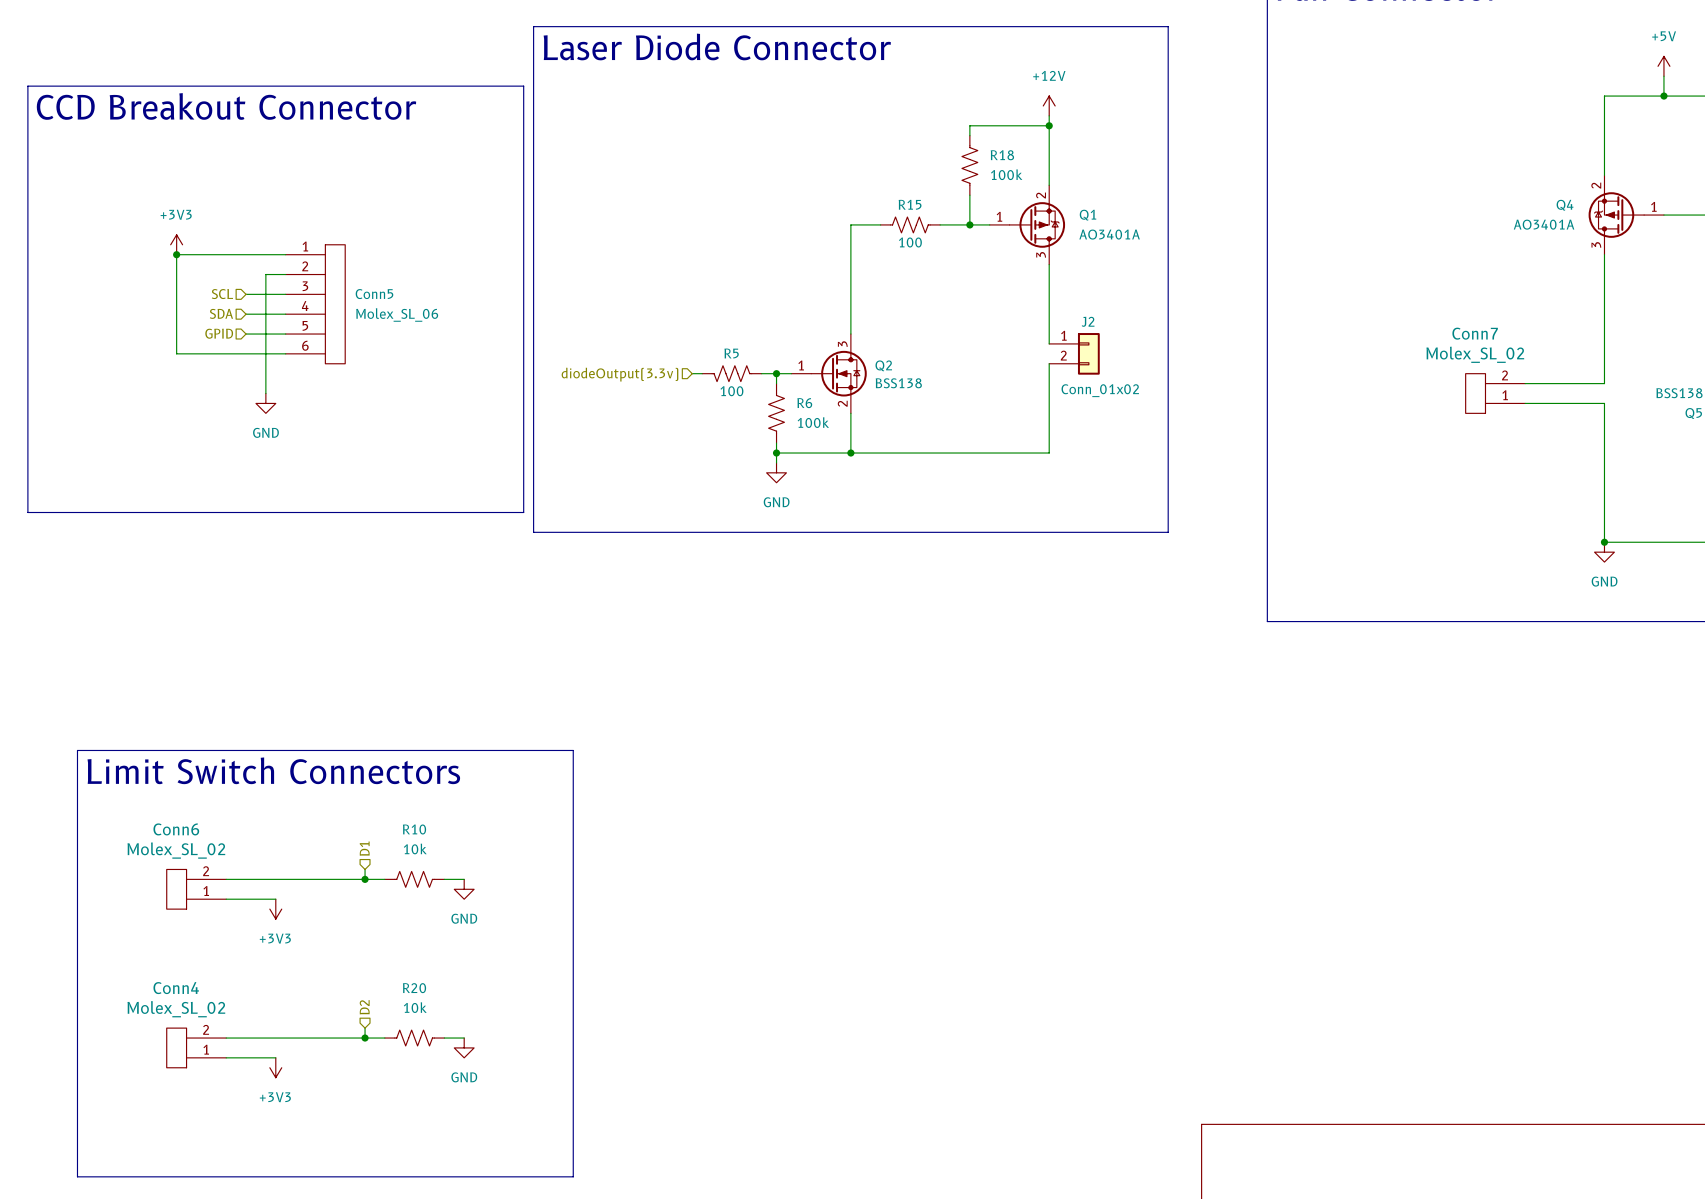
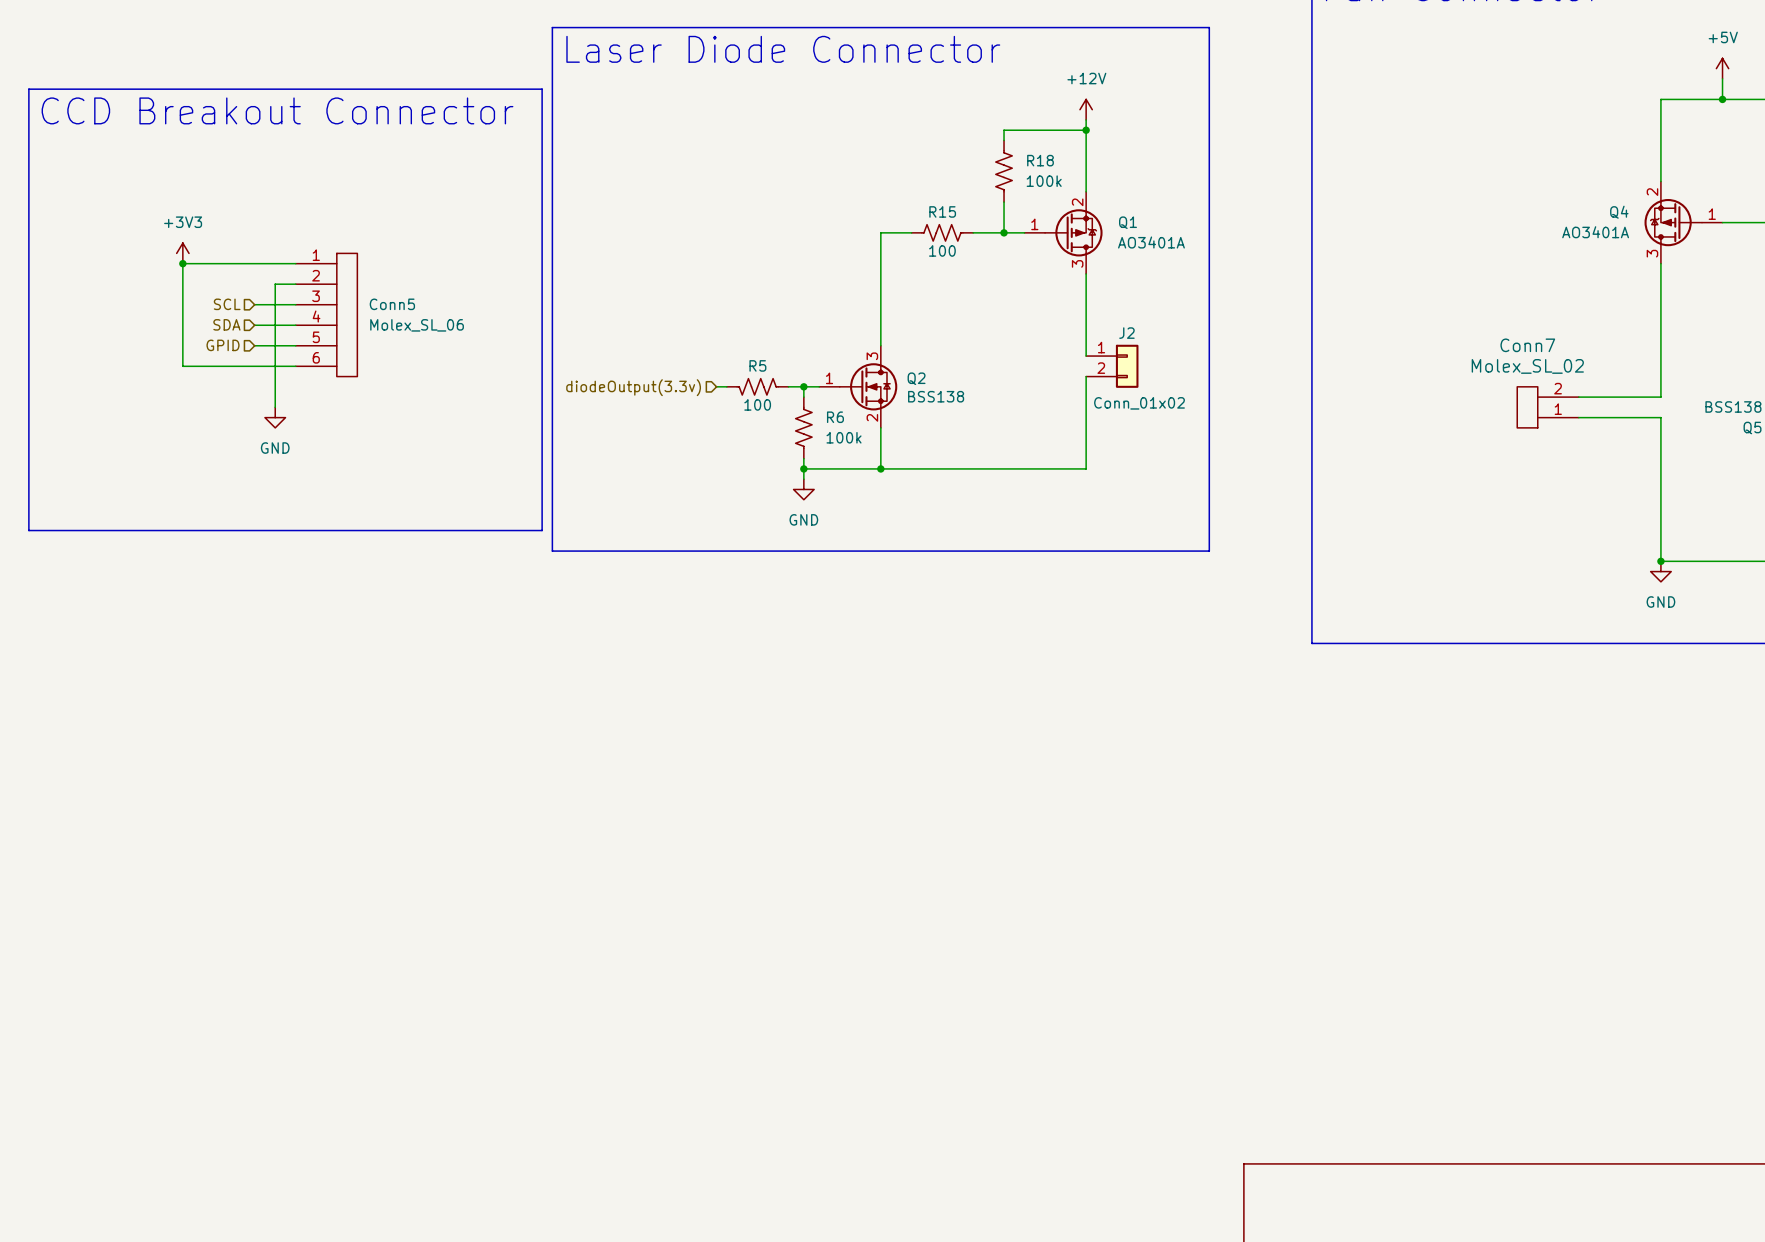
line: (77, 750) (573, 750) (573, 1176) (77, 1176) (77, 750) -> none
text: Limit Switch Connectors (273, 770) -> none
hierarchical label: D1 (364, 848) -> none
wire: (365, 869) (365, 879) -> none
wire: (226, 879) (384, 879) -> none
junction: (365, 879) -> none
R10: 10k (414, 879) -> none
wire: (444, 879) (464, 879) -> none
Conn6: Molex_SL_02 (196, 889) -> none
power symbol: GND (464, 889) -> none
wire: (226, 899) (275, 899) -> none
power symbol: +3V3 (275, 909) -> none
hierarchical label: D2 (364, 1007) -> none
wire: (365, 1028) (365, 1038) -> none
wire: (226, 1038) (384, 1038) -> none
junction: (365, 1038) -> none
R20: 10k (414, 1038) -> none
wire: (444, 1038) (464, 1038) -> none
Conn4: Molex_SL_02 (196, 1047) -> none
power symbol: GND (464, 1047) -> none
wire: (226, 1057) (275, 1057) -> none
power symbol: +3V3 (275, 1067) -> none

